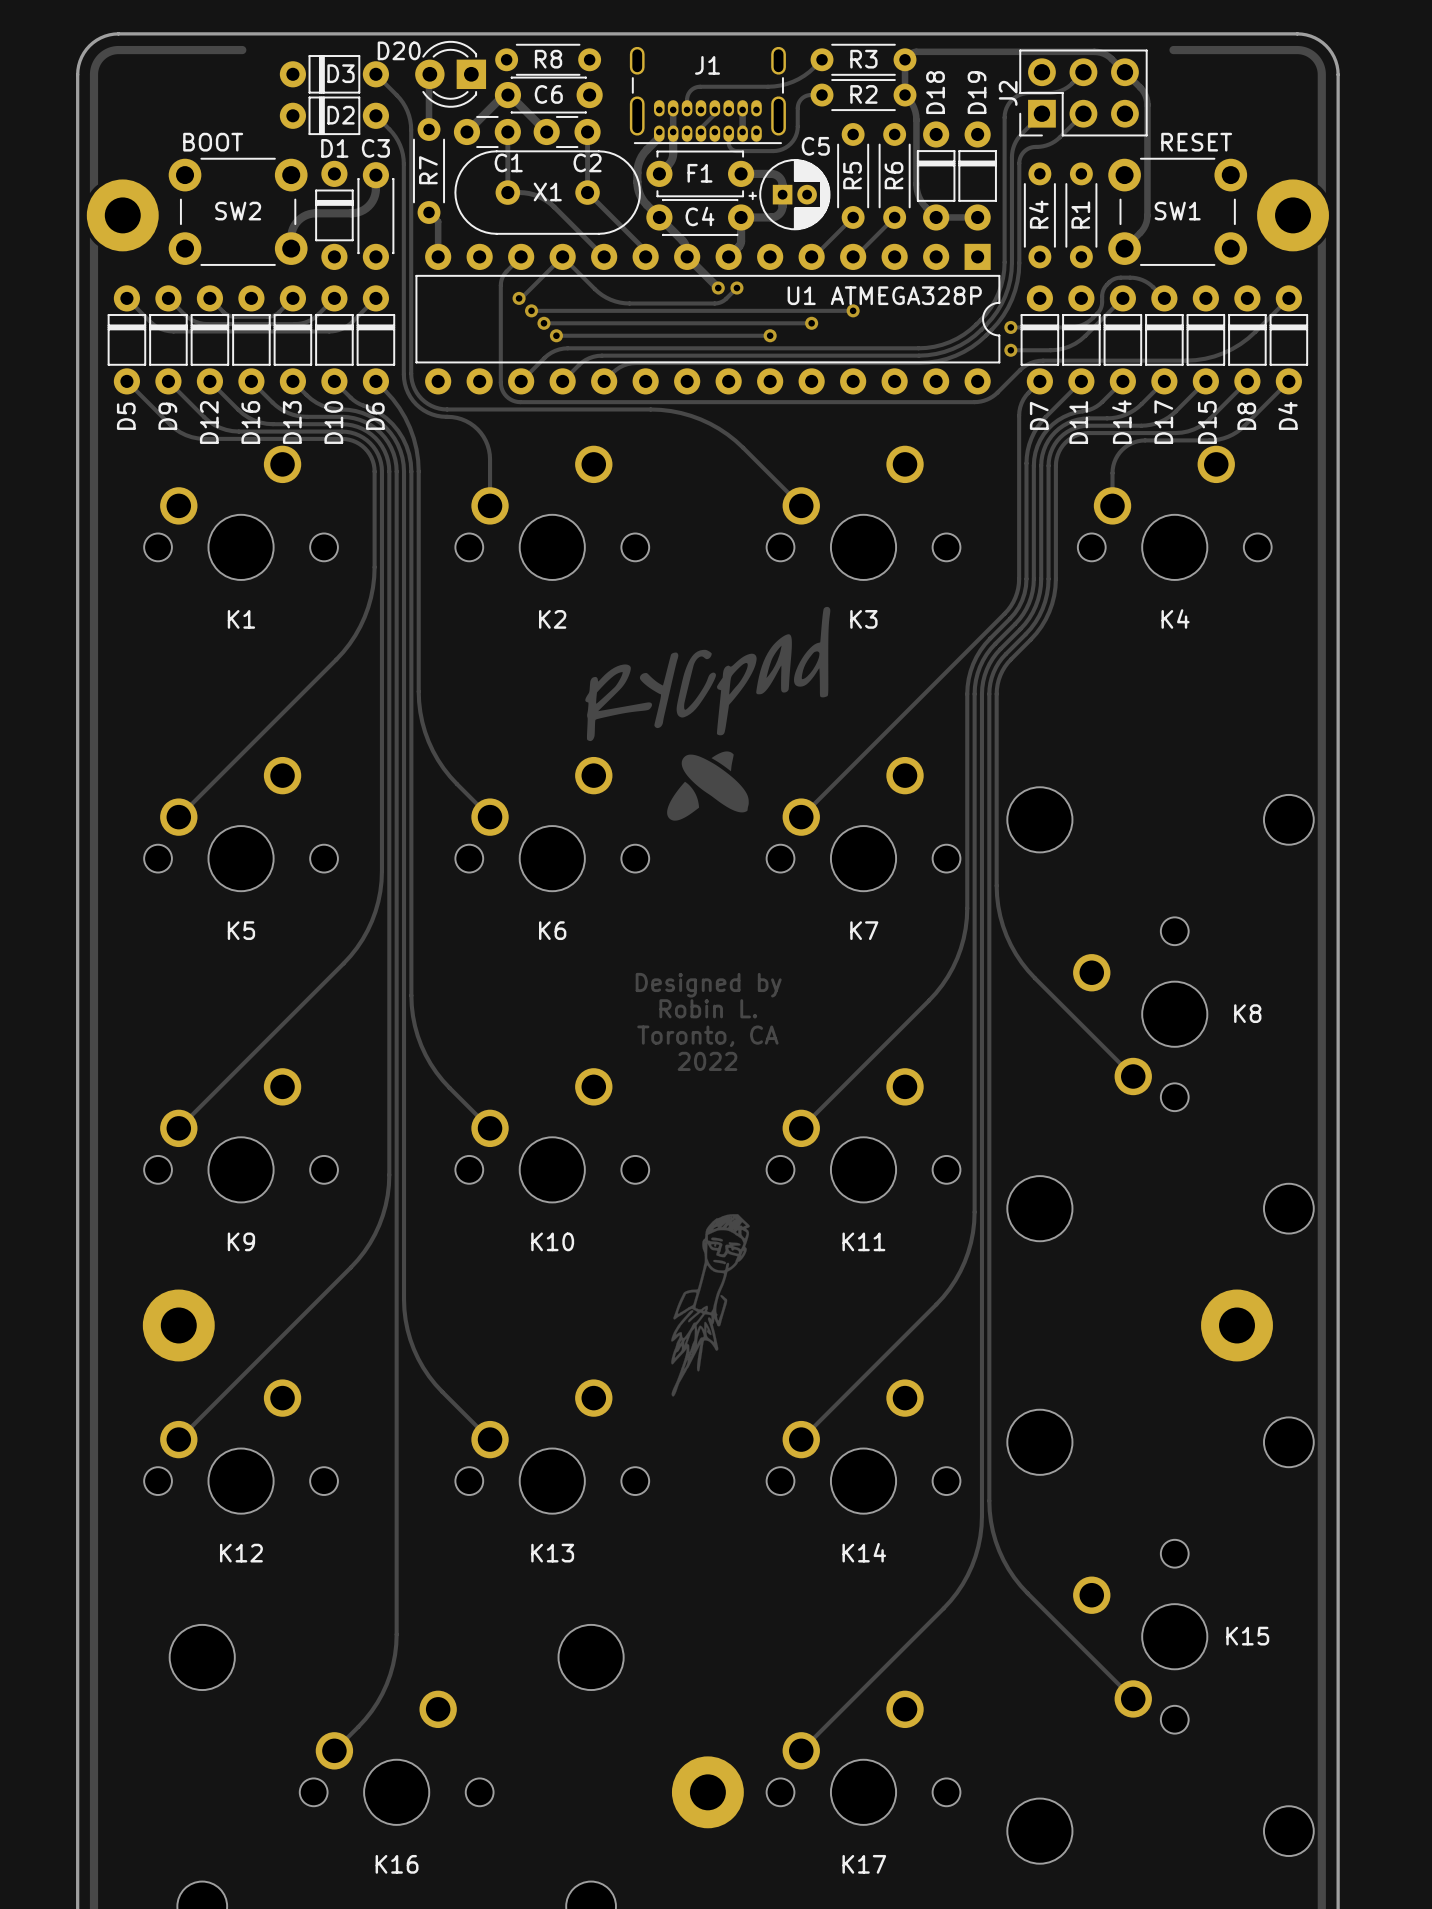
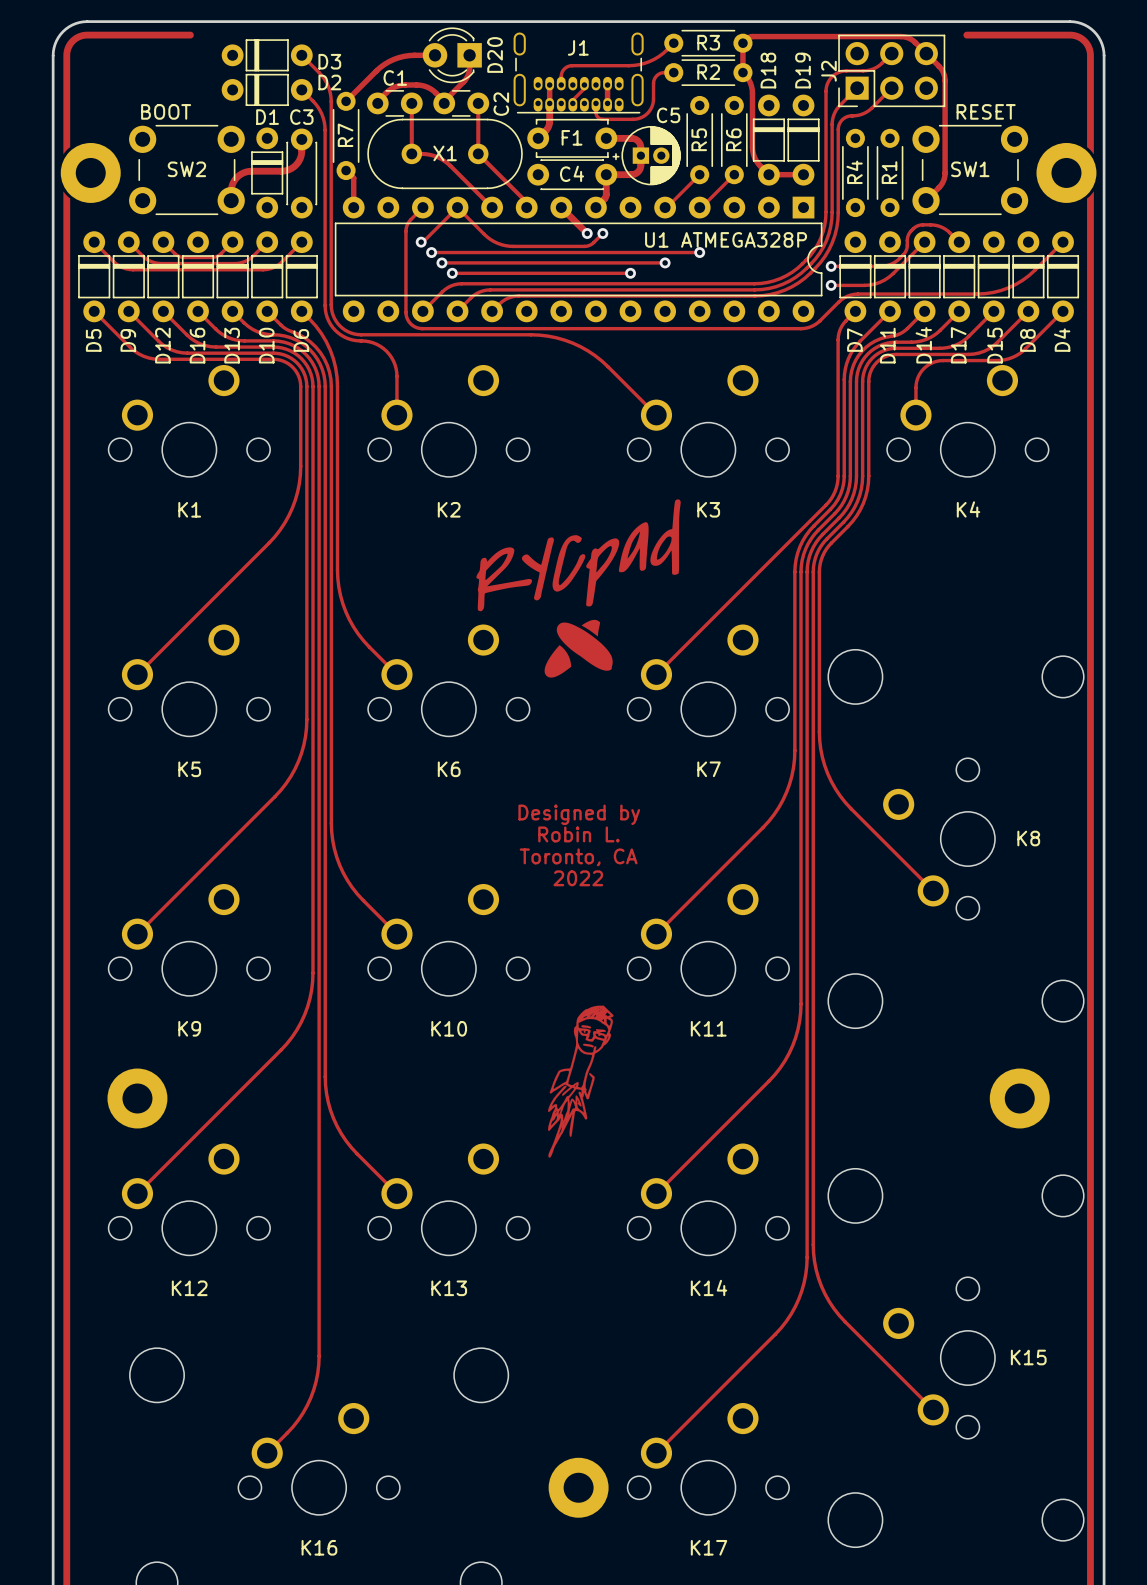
D20 name rotation: 0° (399, 50) -> 90° counterclockwise (495, 54)
D20 name position: D20 (399, 50) -> D20 (495, 54)
R8: (548, 59) -> none
D3 name position: D3 (341, 73) -> D3 (329, 61)
track: (429, 74) (429, 129) -> (435, 55) (409, 55) (388, 61) (376, 71) (346, 101)
D20 position: (450, 74) -> (452, 55)
track: none -> (469, 55) (469, 70) (466, 77) (444, 101) (429, 88) (416, 84) (394, 87) (377, 101)
C6: (548, 95) -> none
D2 name position: D2 (341, 115) -> D2 (329, 82)
track: (466, 131) (503, 95) (509, 95) (546, 131) -> none
track: (659, 131) (659, 137) (644, 153) (639, 160) (637, 168) (637, 188) (644, 202) (684, 242) (687, 256) -> none
C1 name position: C1 (508, 162) -> C1 (395, 77)
C2 name rotation: 0° (587, 162) -> 90° counterclockwise (501, 104)
C2 name position: C2 (587, 162) -> C2 (501, 104)

